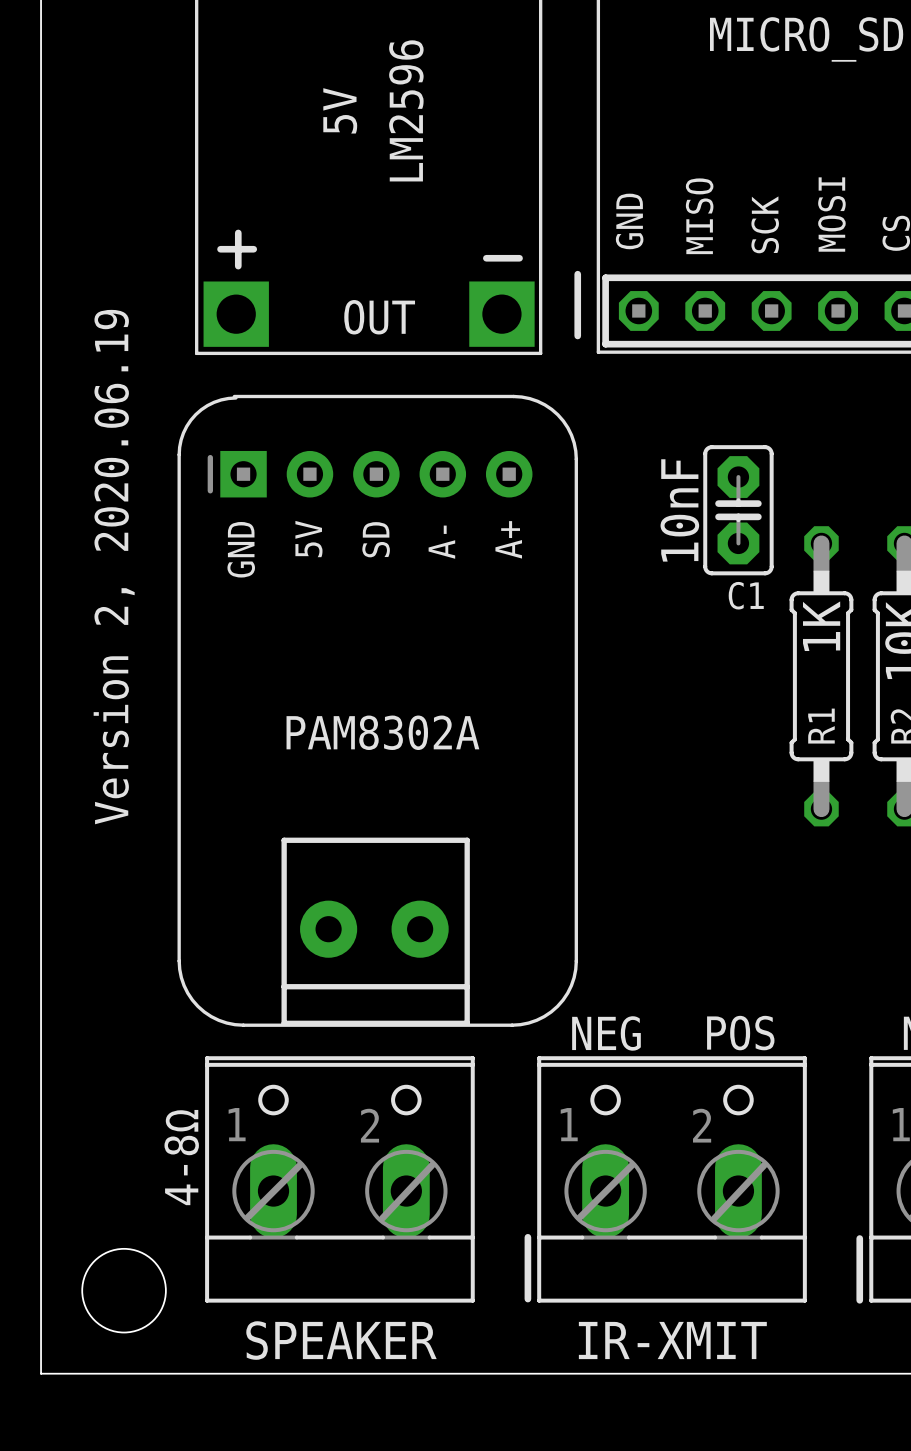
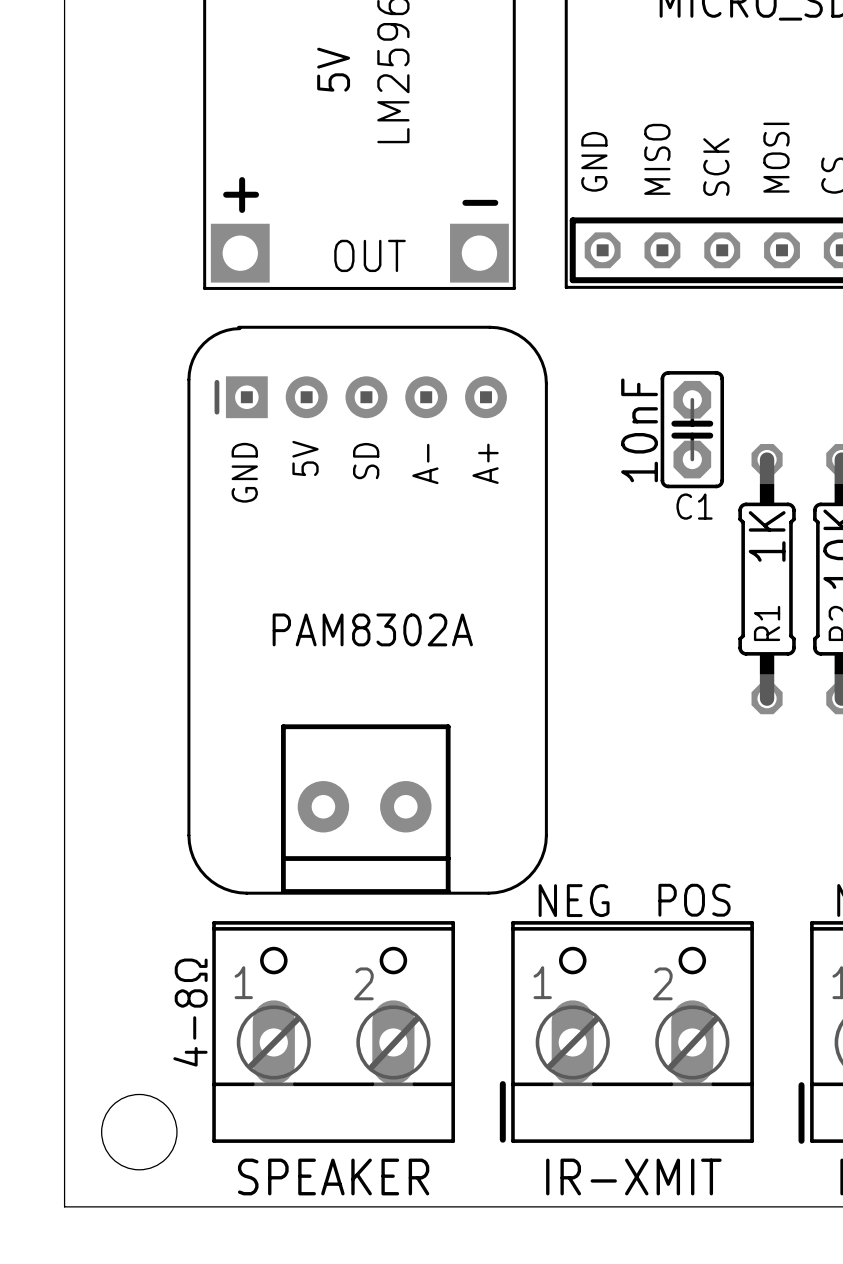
line: (577, 274) (577, 335) -> none
text: Version 2, 2020.06.19 (114, 567) -> none

